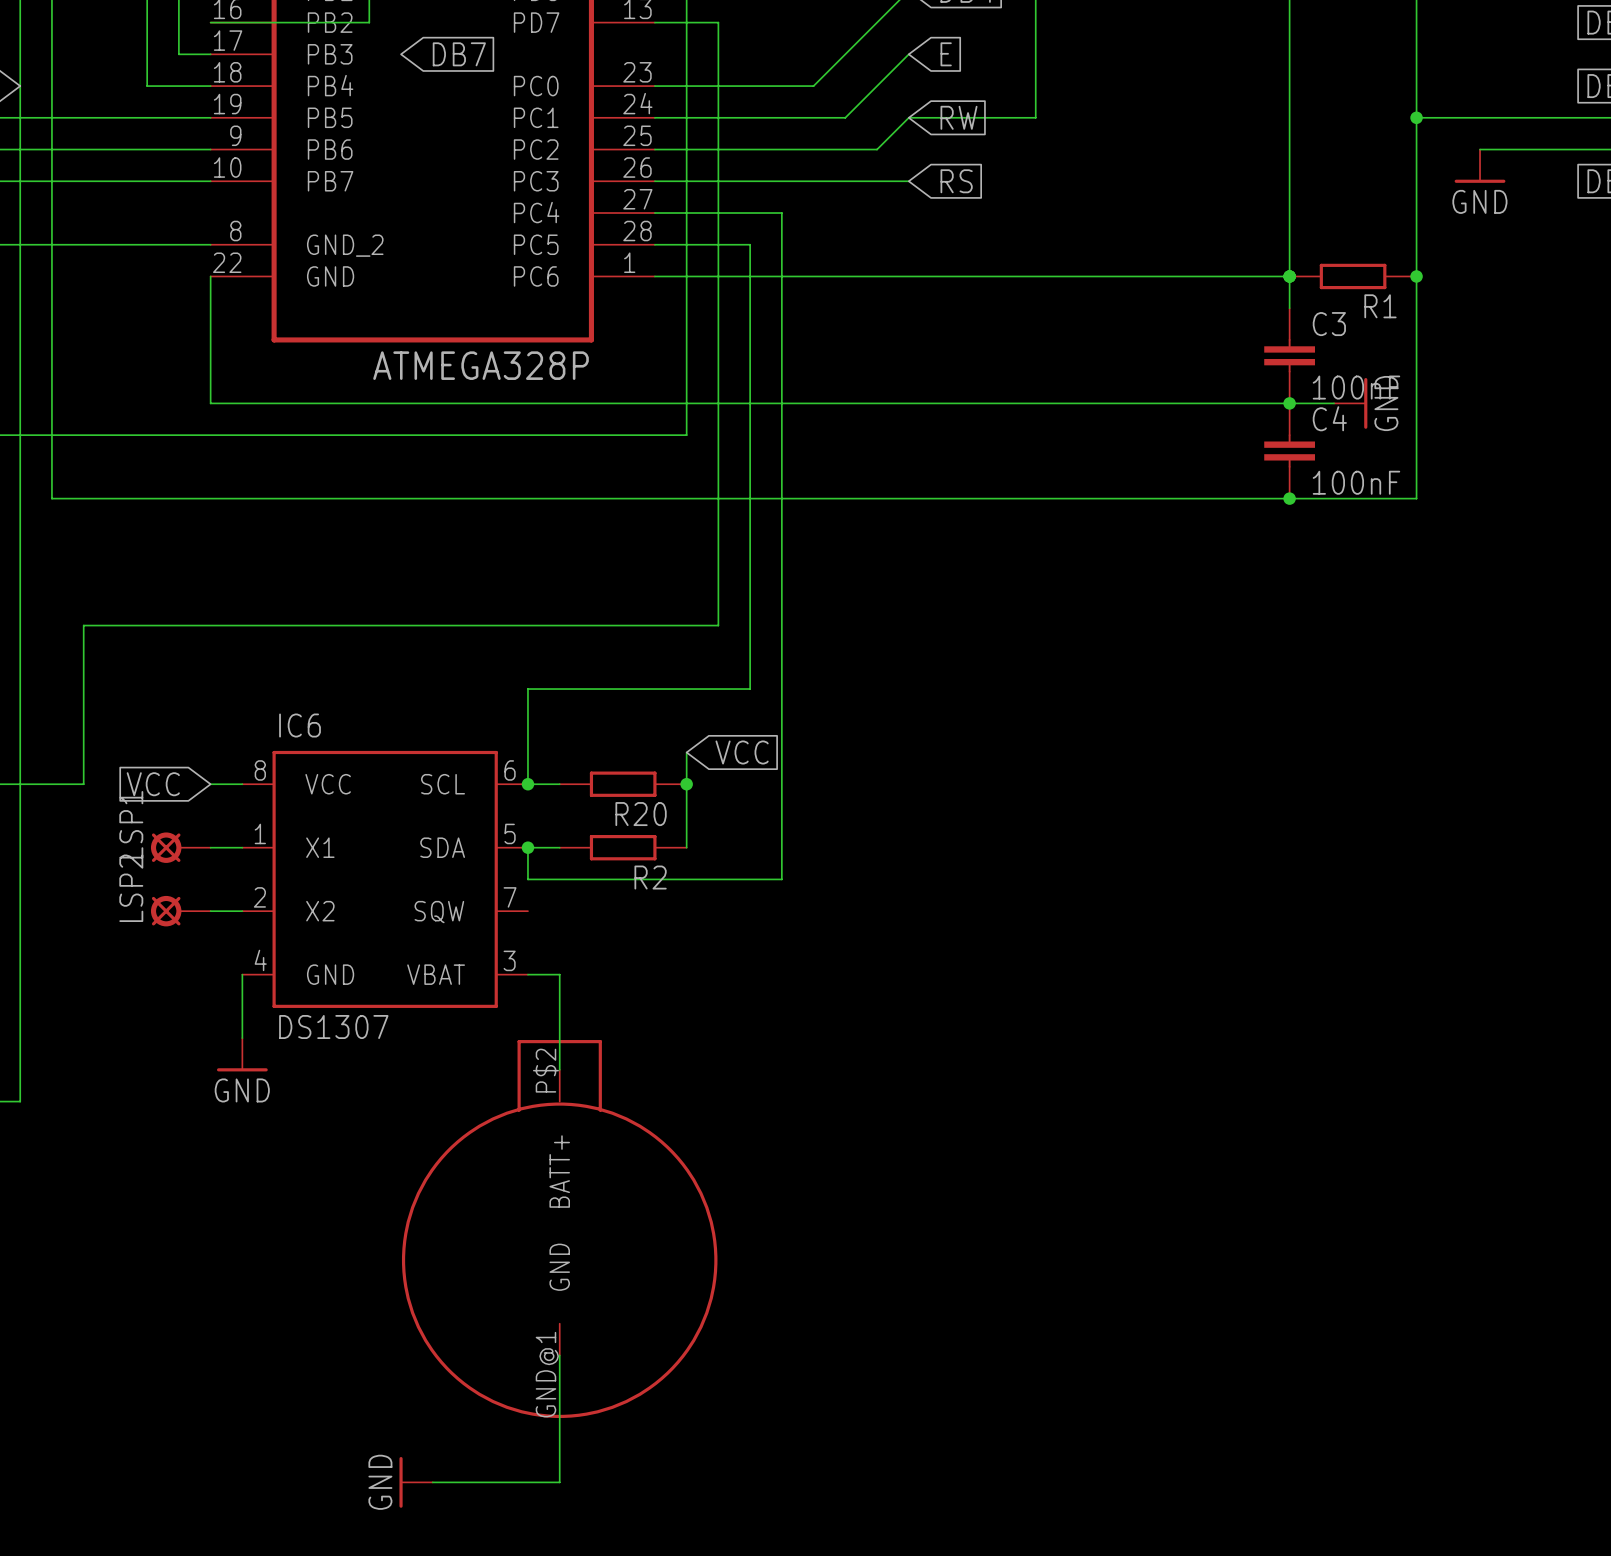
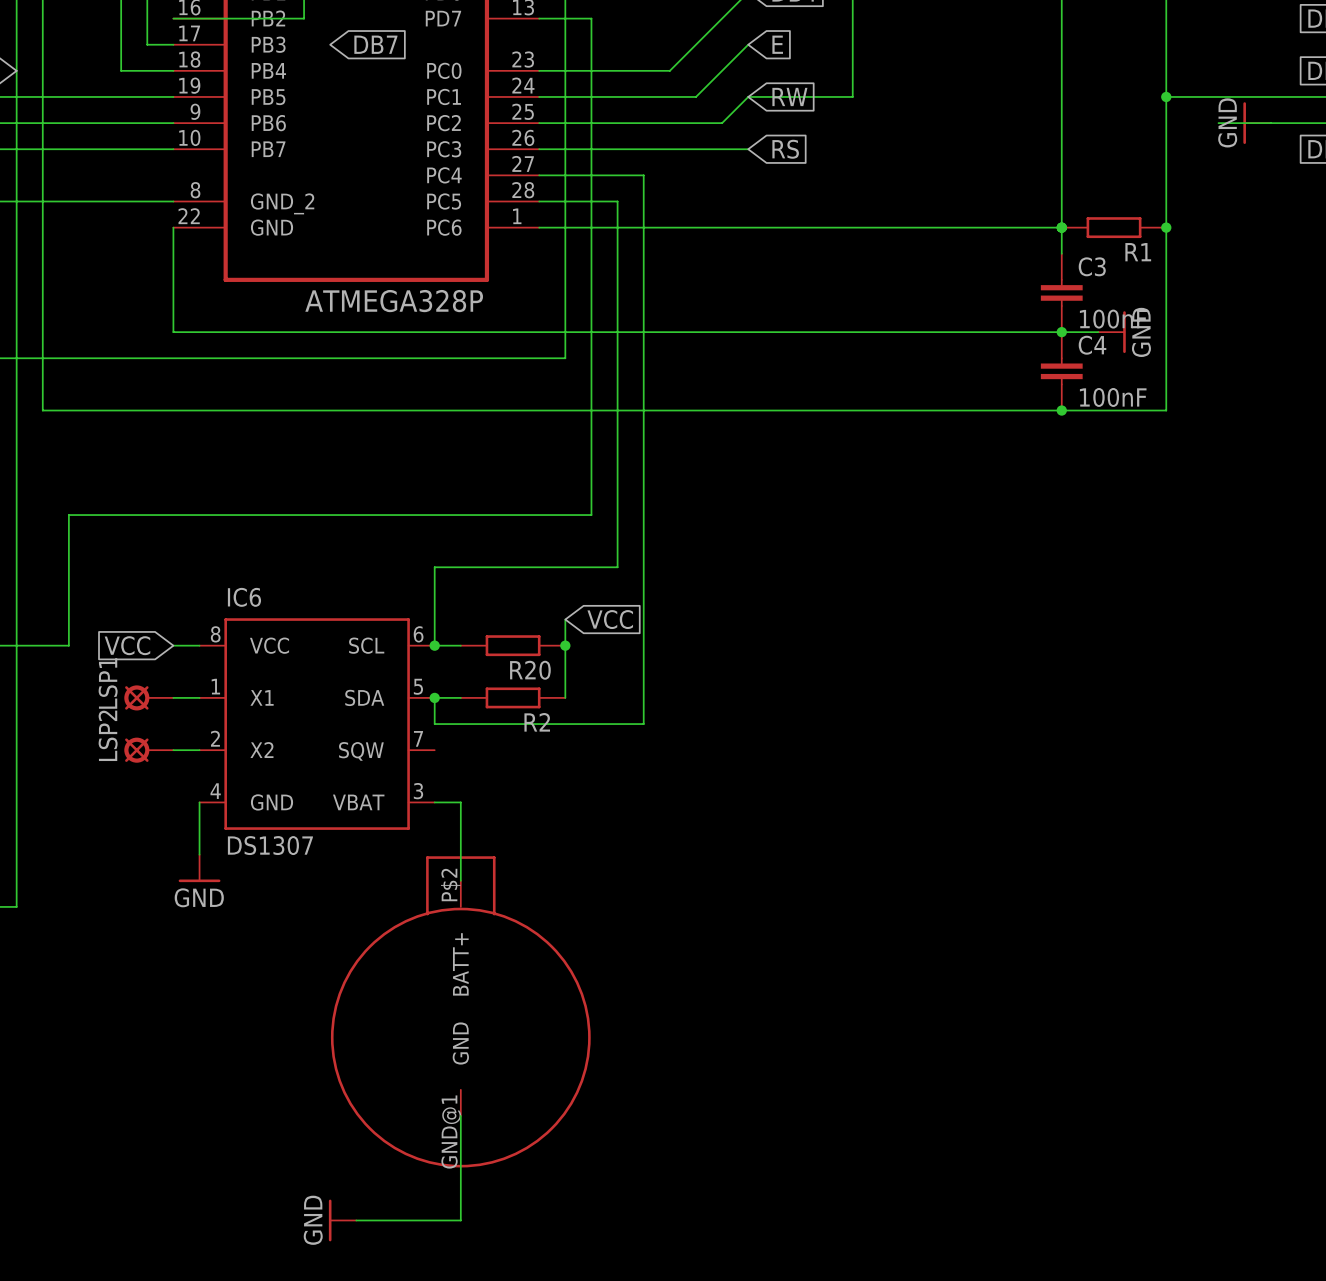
power symbol position: GND (1480, 166) -> GND (1257, 123)
power symbol rotation: 0° (1480, 181) -> 90° clockwise (1244, 123)

